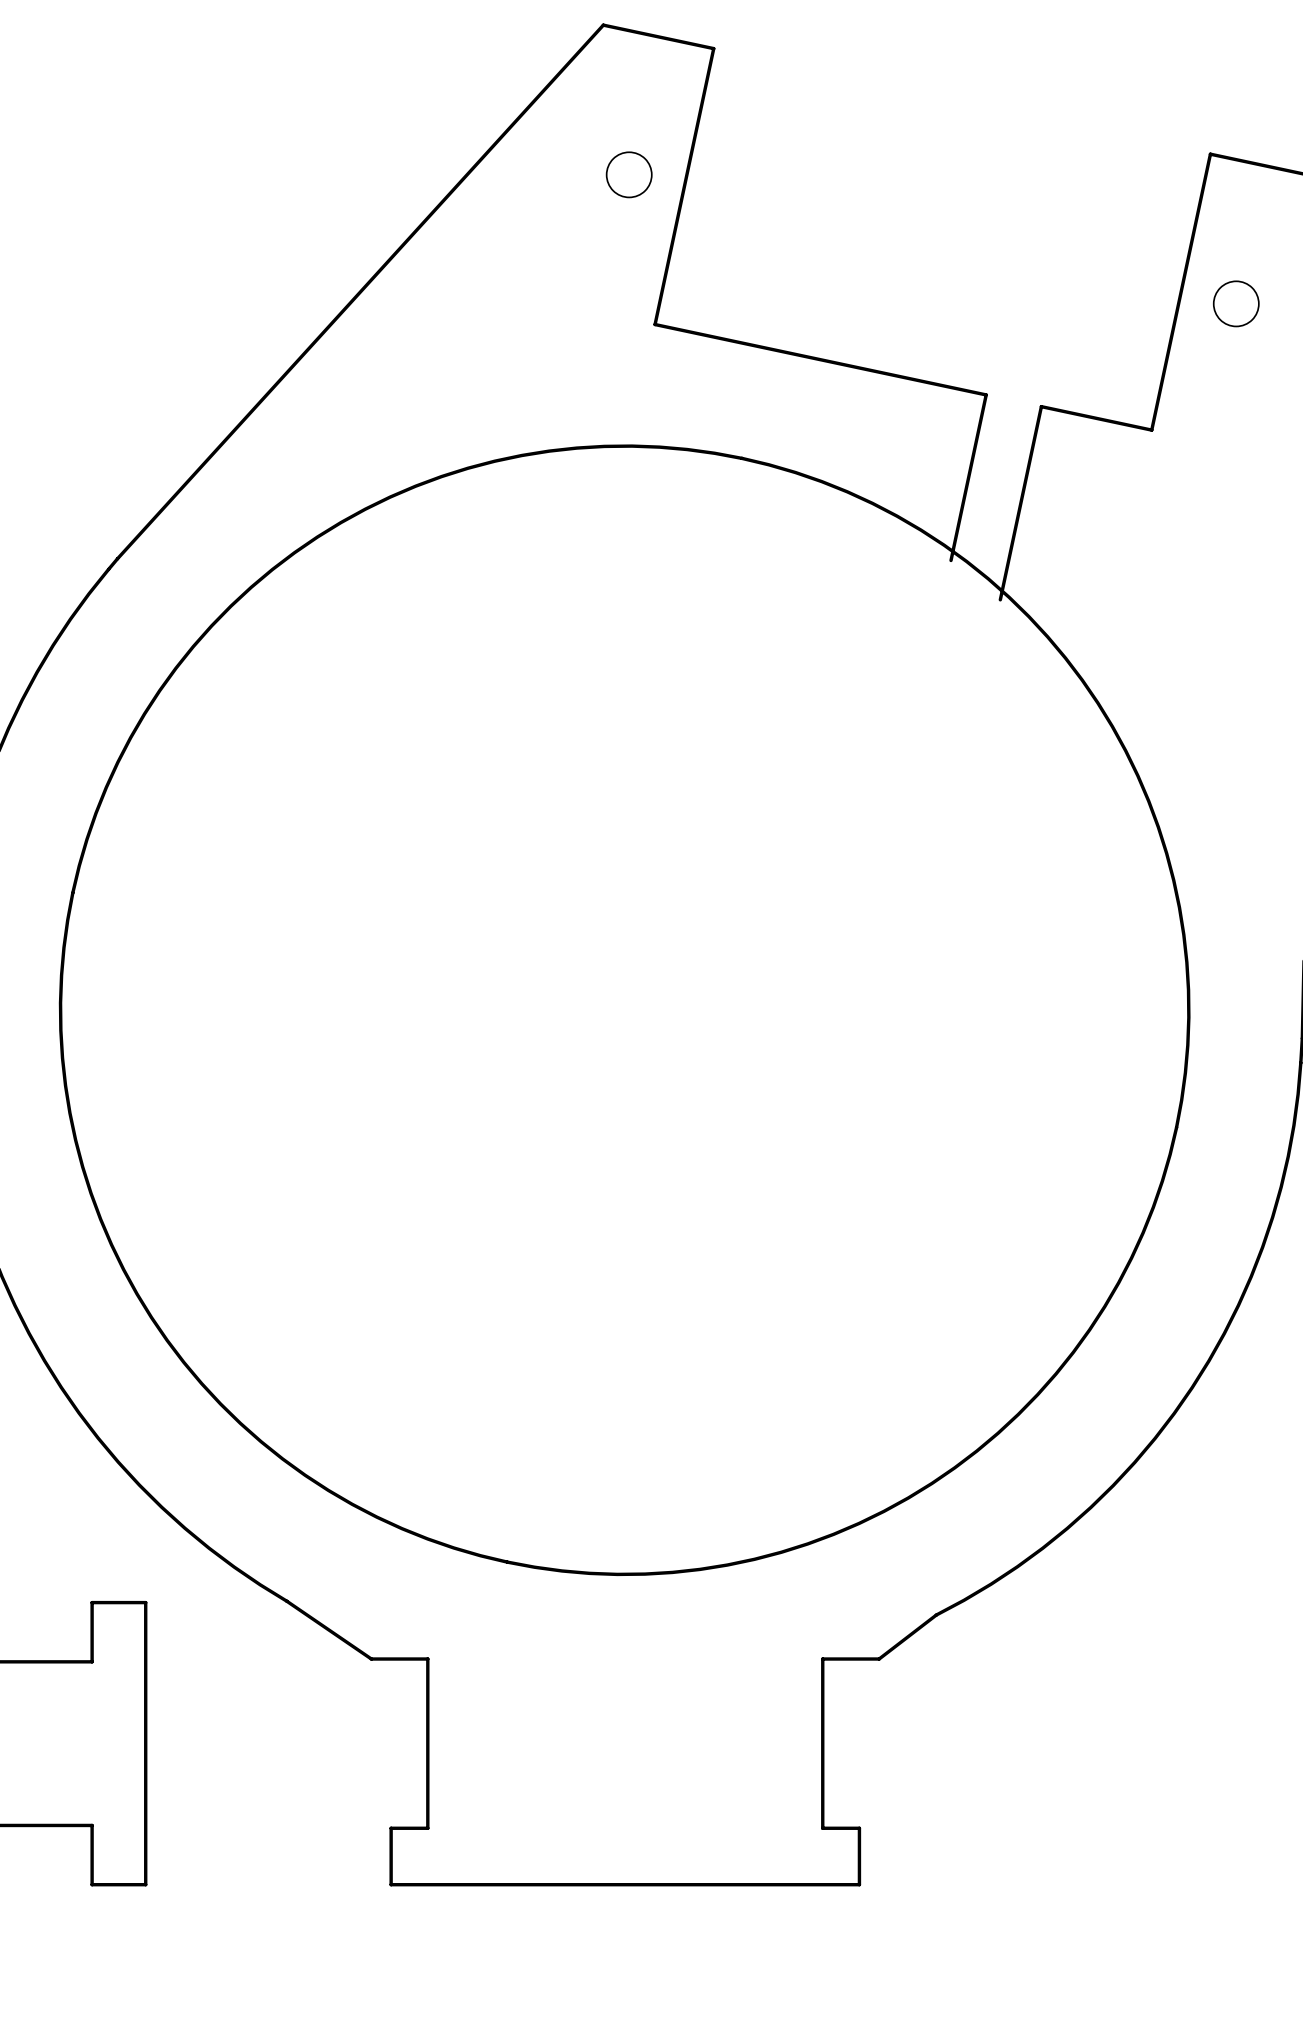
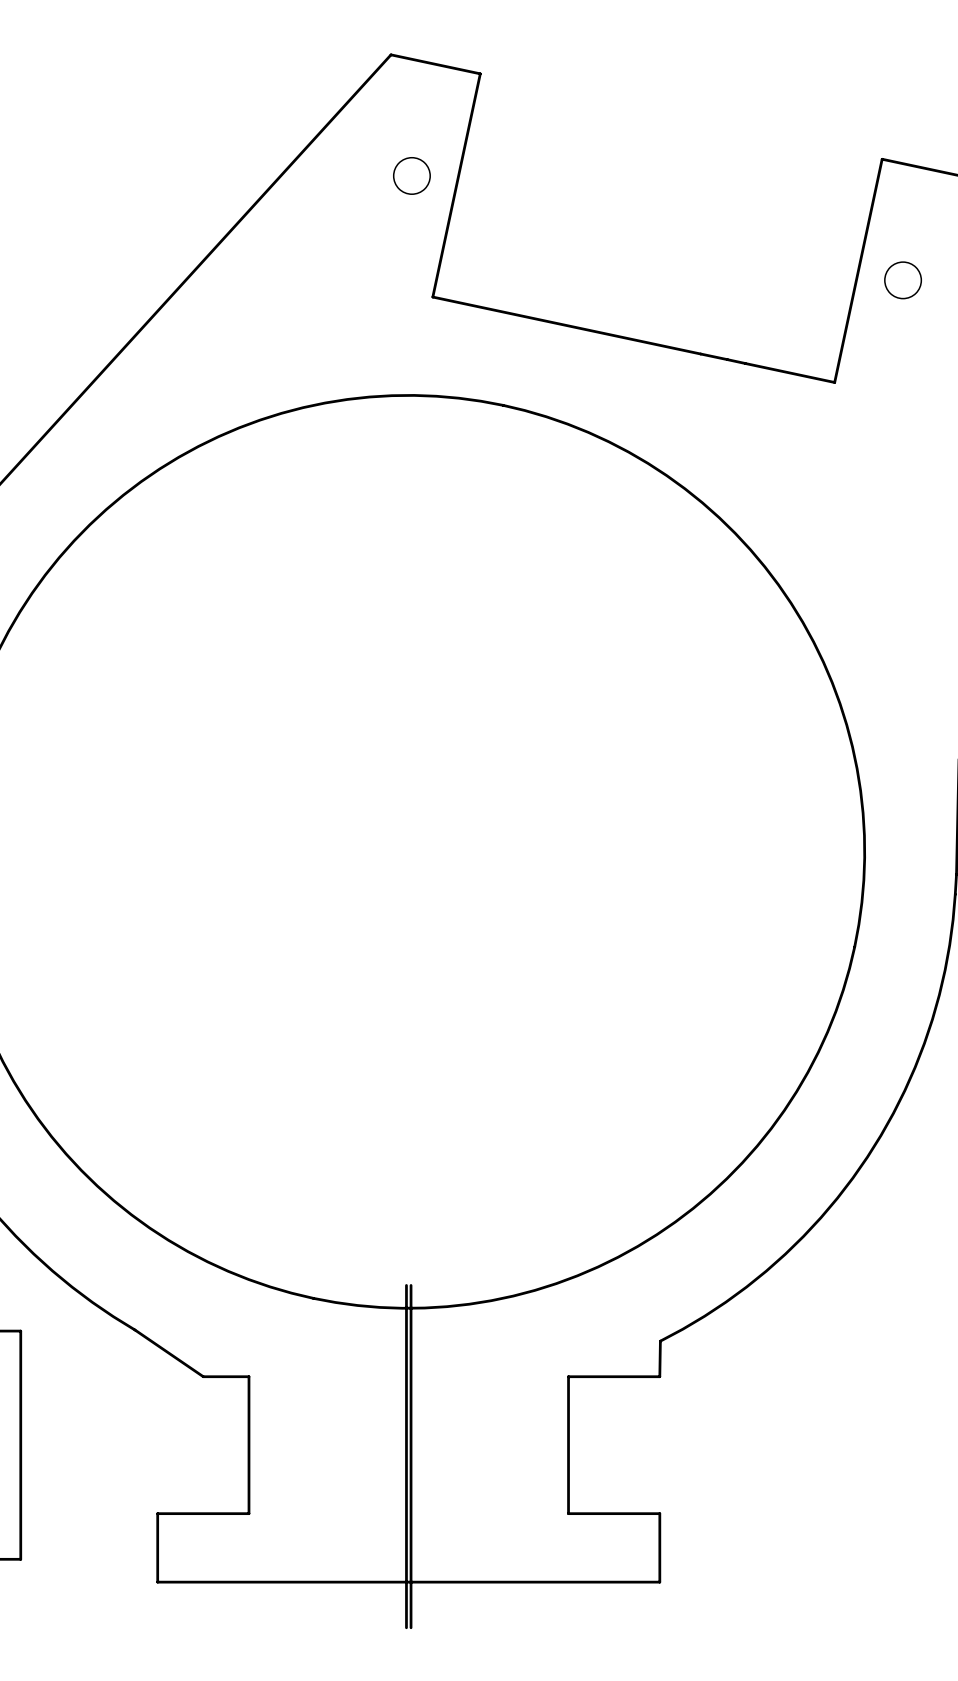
board edge: (986, 394) (951, 560) -> (700, 354) (745, 363)
board edge: (1041, 406) (1000, 599) -> none
board edge: none -> (406, 1285) (406, 1627)
board edge: none -> (411, 1285) (411, 1627)
board edge: (936, 1615) (879, 1659) -> (660, 1341) (659, 1376) (614, 1376)
board edge: (859, 1828) (859, 1884) (391, 1884) (391, 1828) -> (598, 1513) (659, 1513) (659, 1582) (157, 1582) (157, 1513) (219, 1513)

